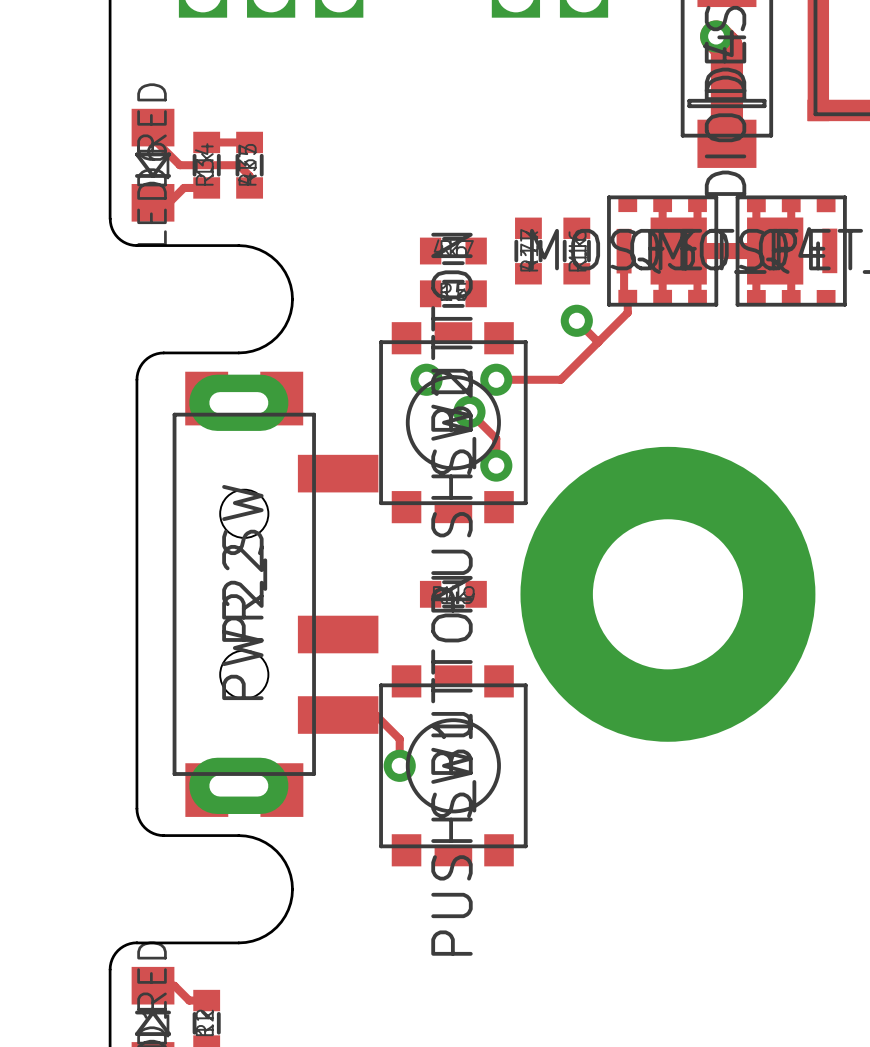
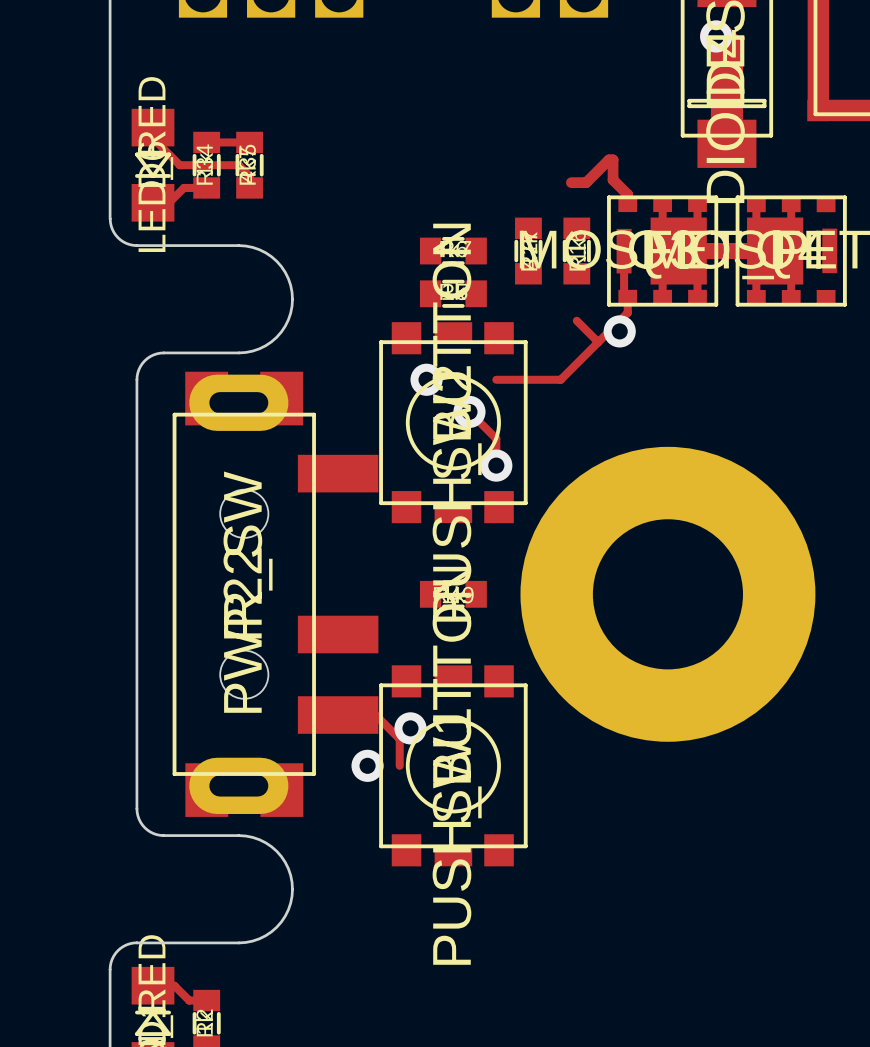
track: none -> (571, 182) (586, 182) (608, 159) (613, 159) (613, 179) (627, 194) (627, 204)
via position: (576, 320) -> (619, 331)
via: (496, 379) -> none
via: none -> (410, 728)
via position: (399, 765) -> (367, 765)

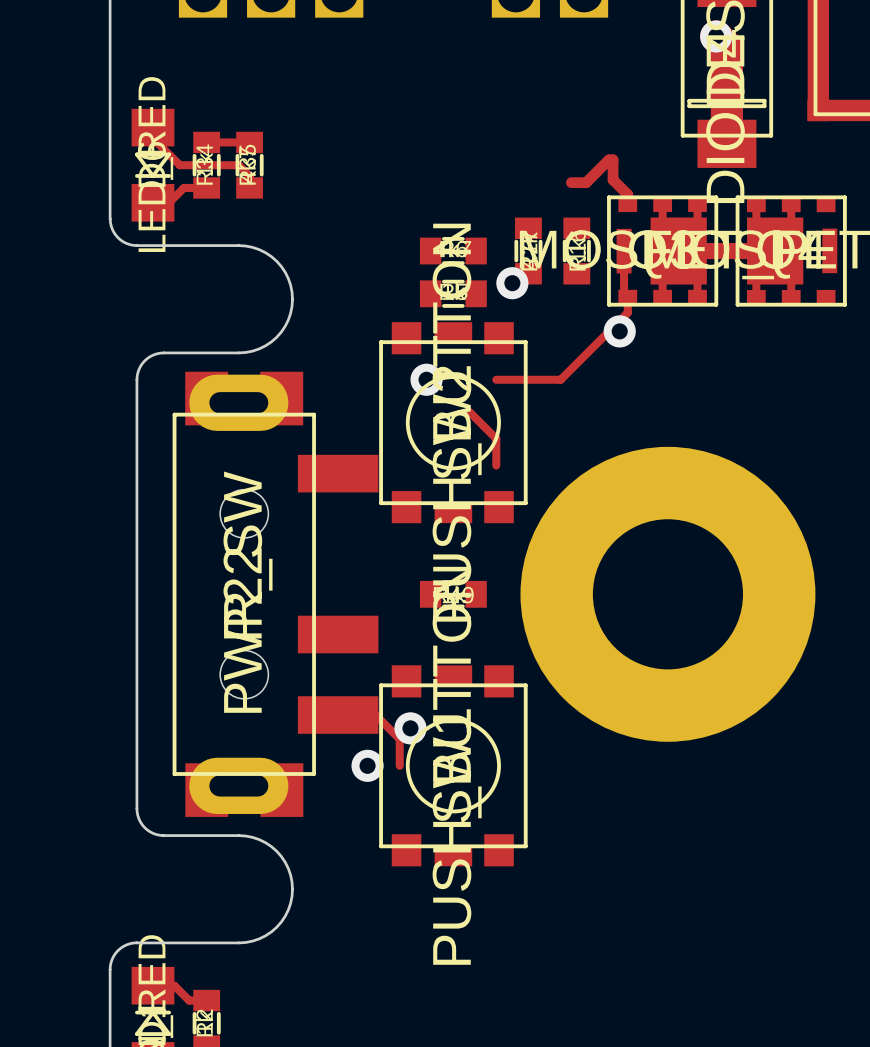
via: none -> (512, 283)
track: (576, 320) (598, 342) -> none
via: (469, 411) -> none
via: (496, 465) -> none

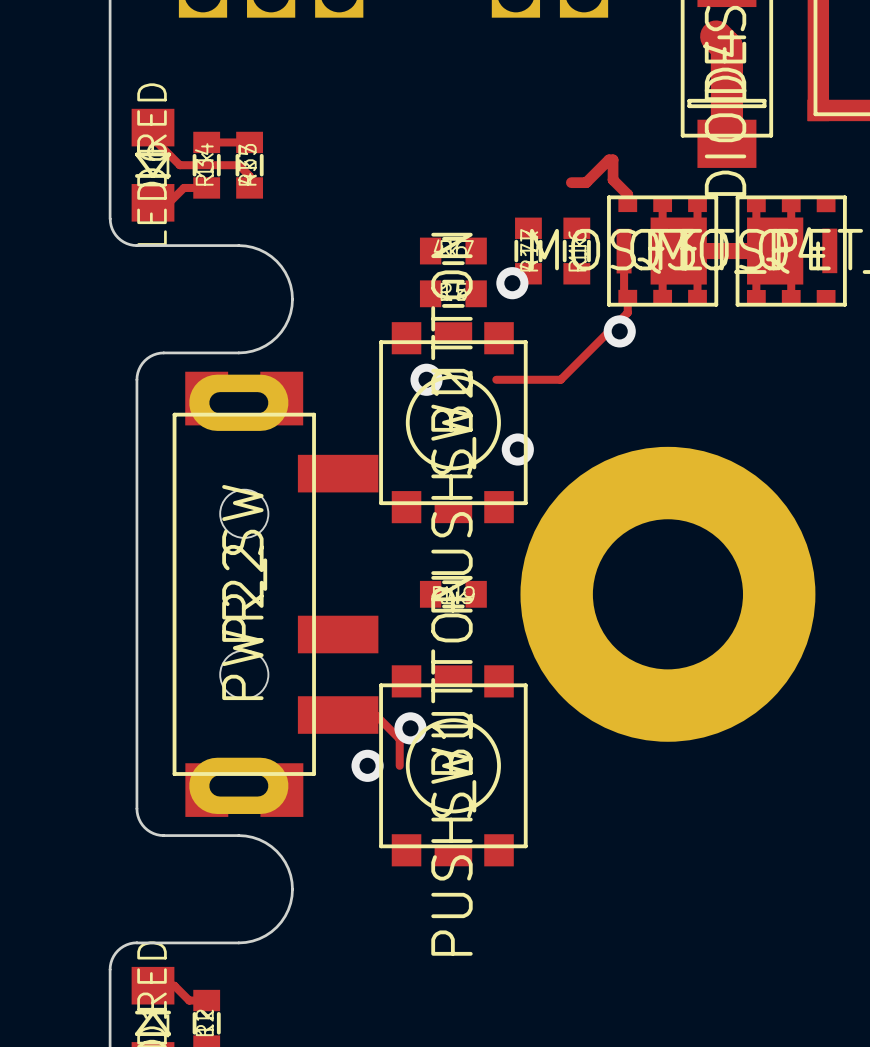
via: (716, 36) -> none
track: (469, 411) (496, 438) (496, 465) -> none
via: none -> (517, 449)

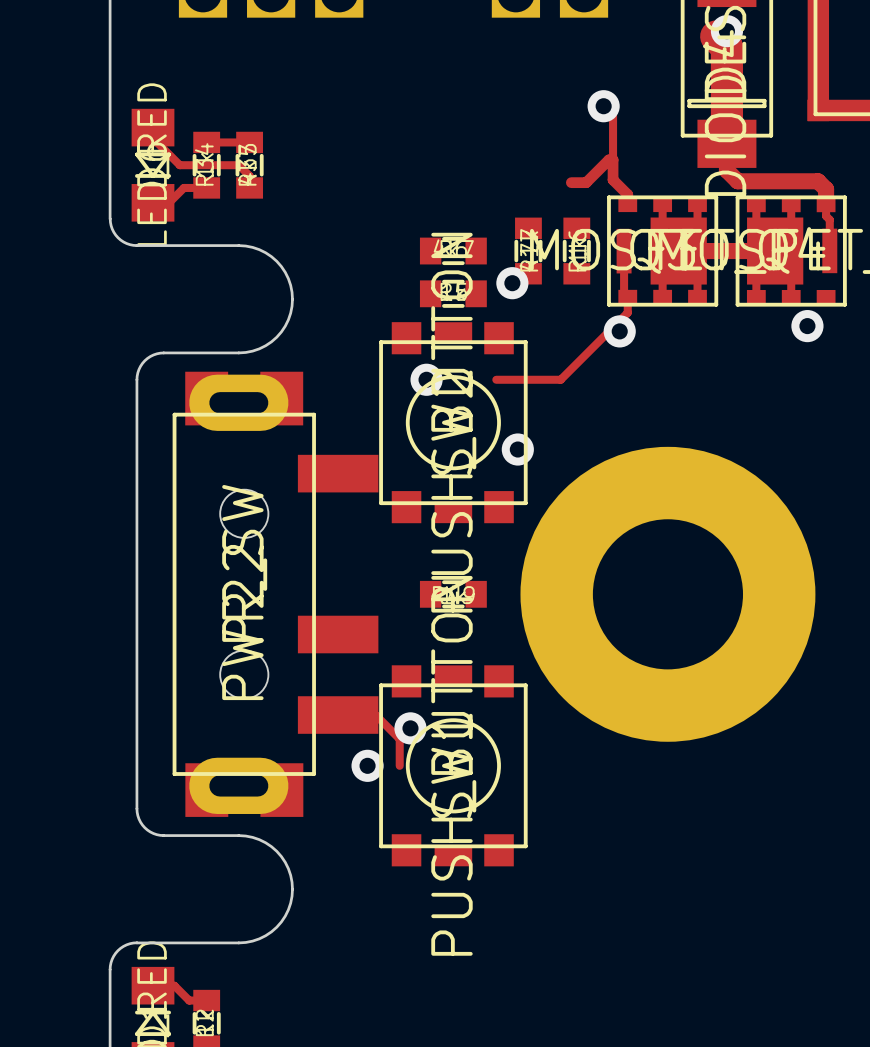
via: none -> (726, 31)
track: none -> (603, 106) (613, 115) (613, 159)
via: none -> (603, 106)
track: none -> (726, 143) (726, 170) (737, 181) (818, 181) (826, 189) (826, 216) (829, 219) (829, 250)
via: none -> (807, 326)

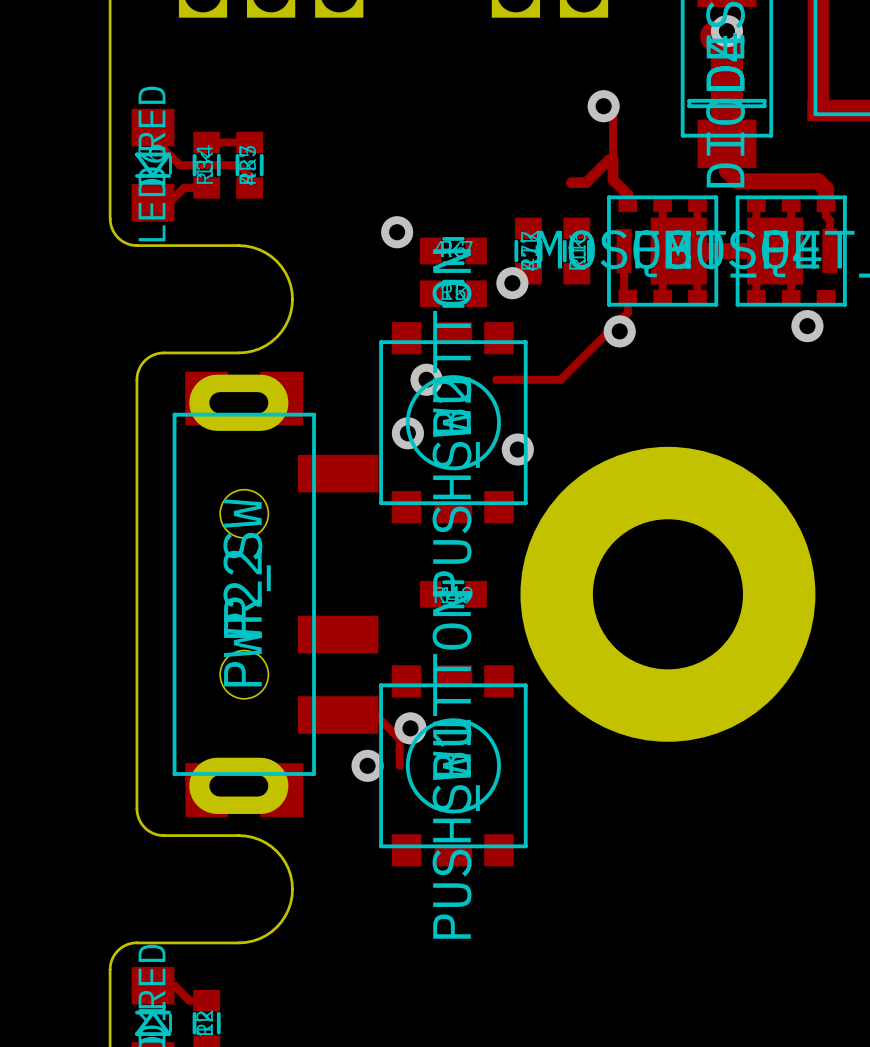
via: none -> (397, 232)
via: none -> (407, 433)

